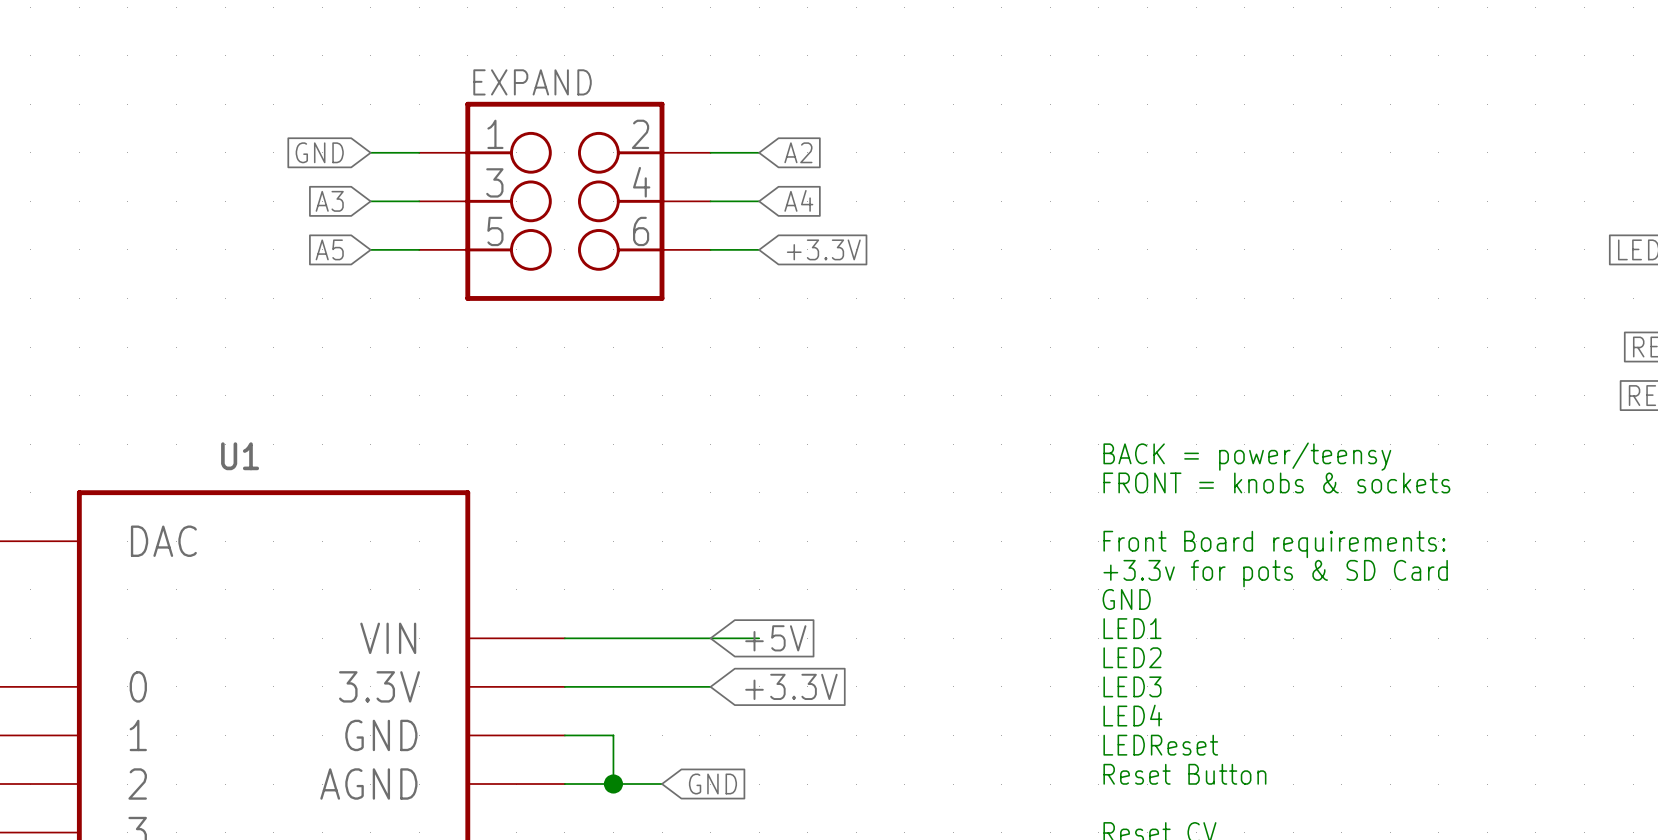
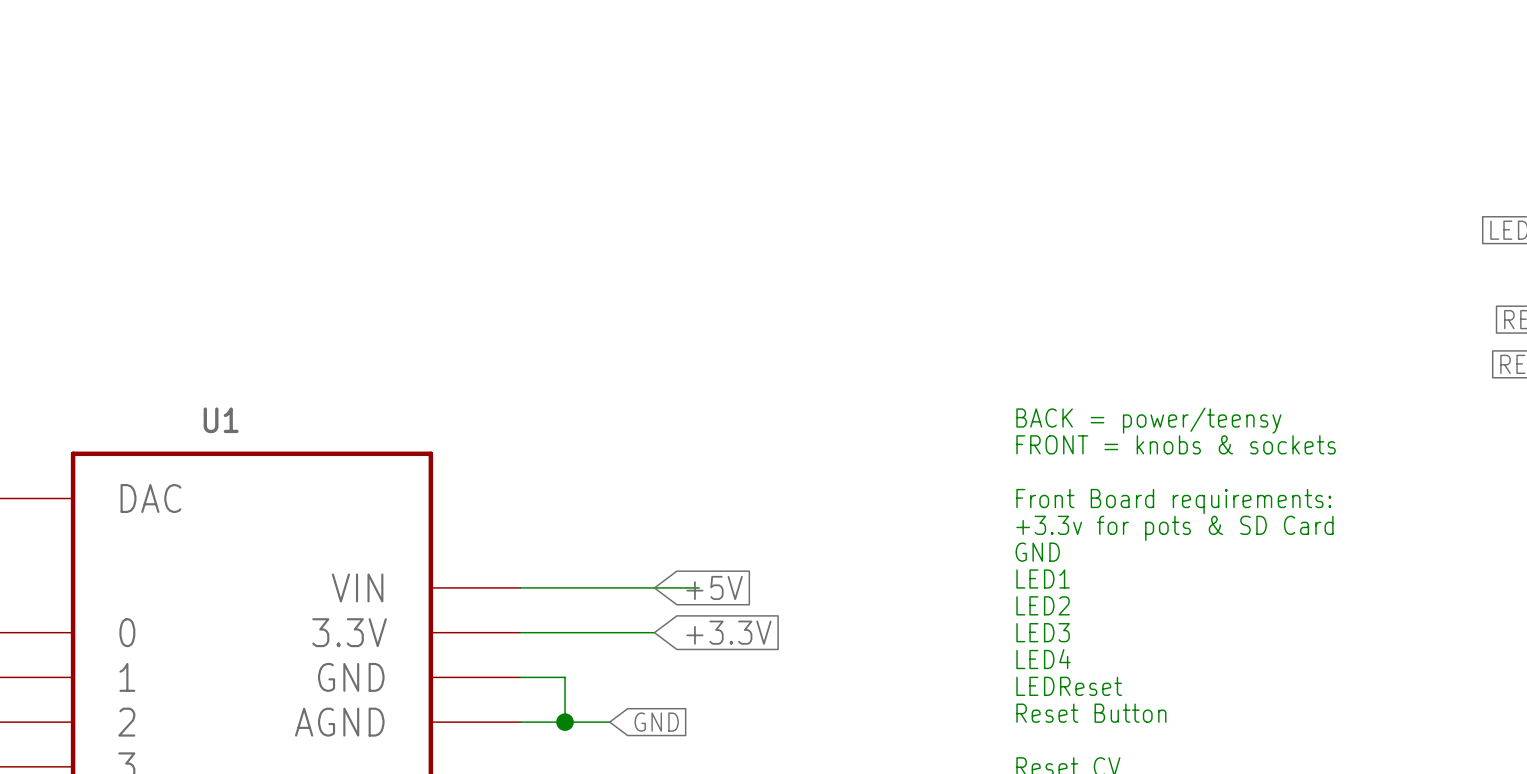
global label: GND (319, 152) -> none
wire: (370, 152) (419, 152) -> none
wire: (710, 152) (759, 152) -> none
global label: A2 (798, 152) -> none
global label: A4 (798, 200) -> none
global label: A3 (329, 201) -> none
wire: (370, 201) (419, 201) -> none
EXPAND: (564, 201) -> none
wire: (710, 201) (759, 201) -> none
global label: A5 (329, 249) -> none
wire: (370, 249) (419, 249) -> none
wire: (710, 249) (759, 249) -> none
global label: +3.3V (823, 249) -> none

